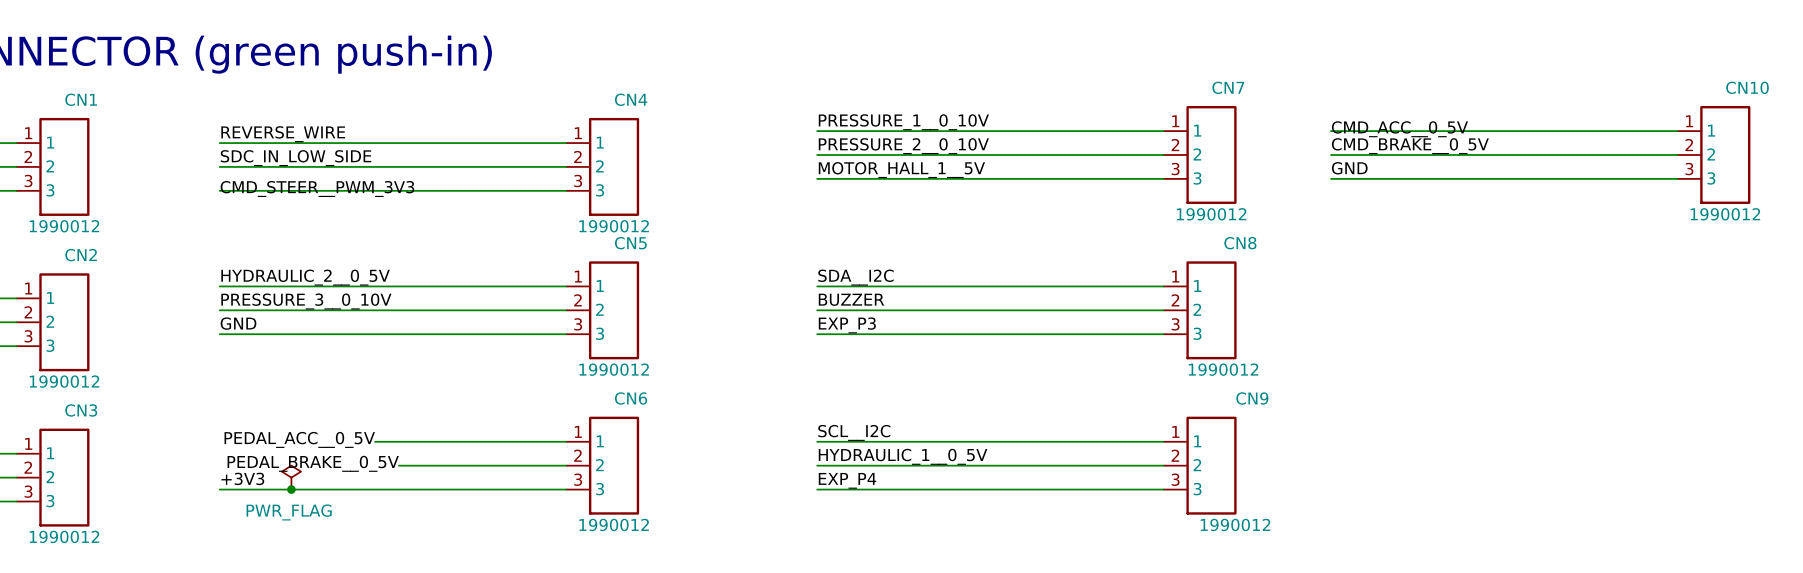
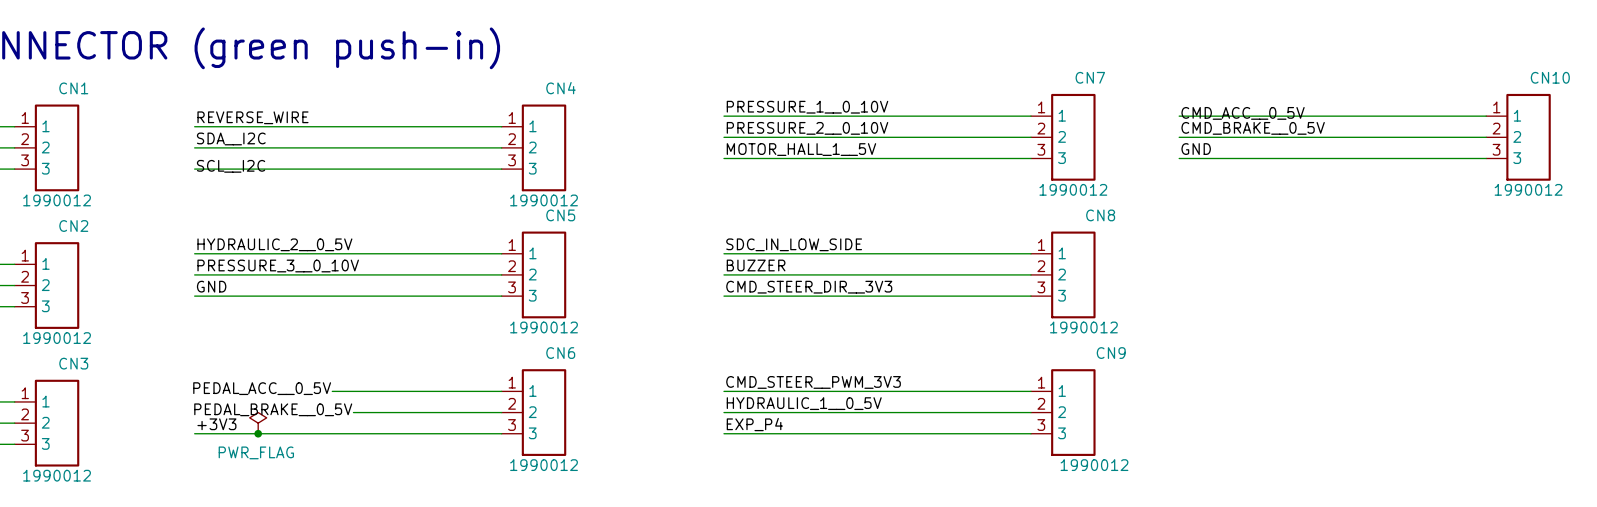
label: SDC_IN_LOW_SIDE (296, 158) -> SDA__I2C (231, 138)
label: CMD_STEER__PWM_3V3 (317, 188) -> SCL__I2C (231, 166)
label: SDA__I2C (855, 277) -> SDC_IN_LOW_SIDE (794, 244)
label: EXP_P3 (847, 325) -> CMD_STEER_DIR__3V3 (809, 287)
label: SCL__I2C (854, 432) -> CMD_STEER__PWM_3V3 (813, 382)

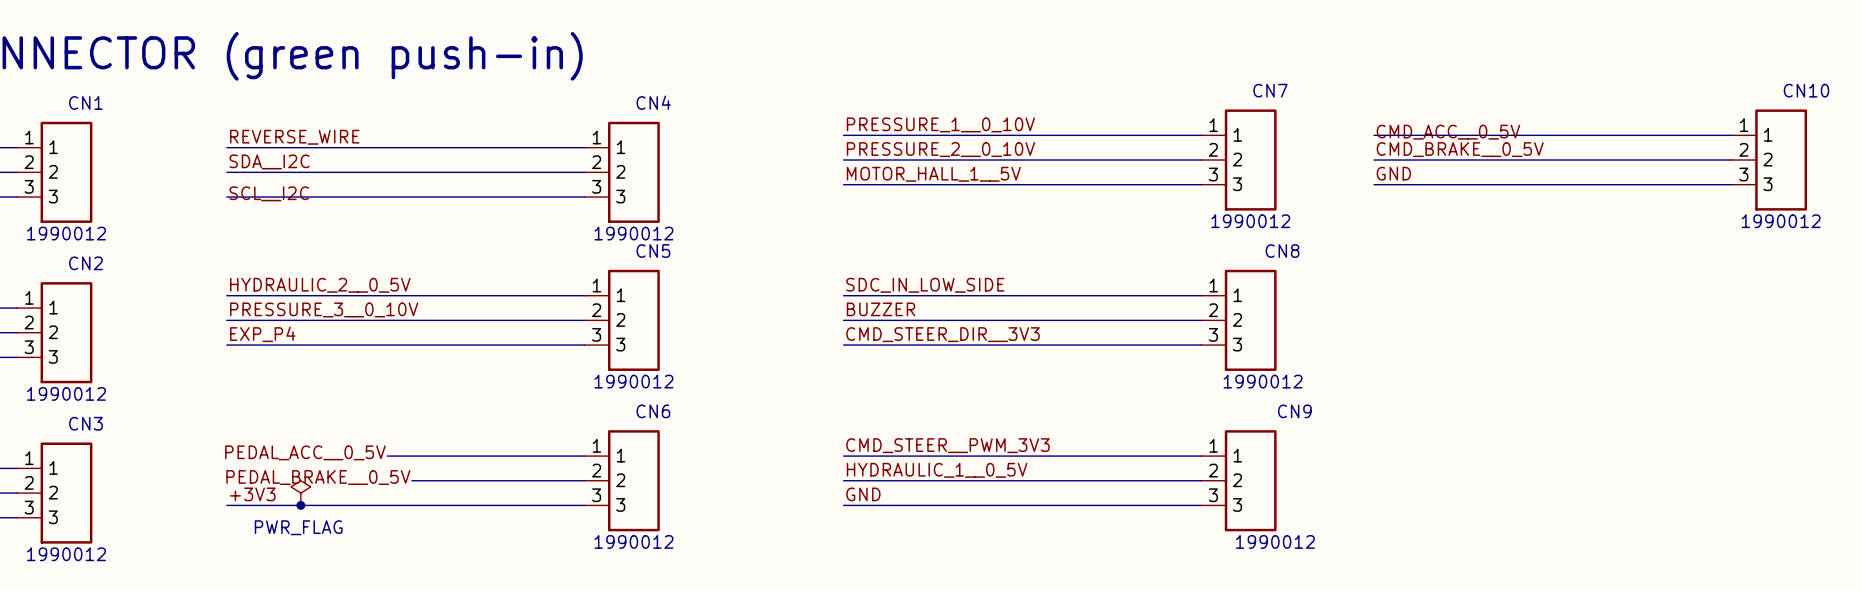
label: GND (211, 286) -> EXP_P4 (262, 334)
label: EXP_P4 (754, 424) -> GND (863, 494)

